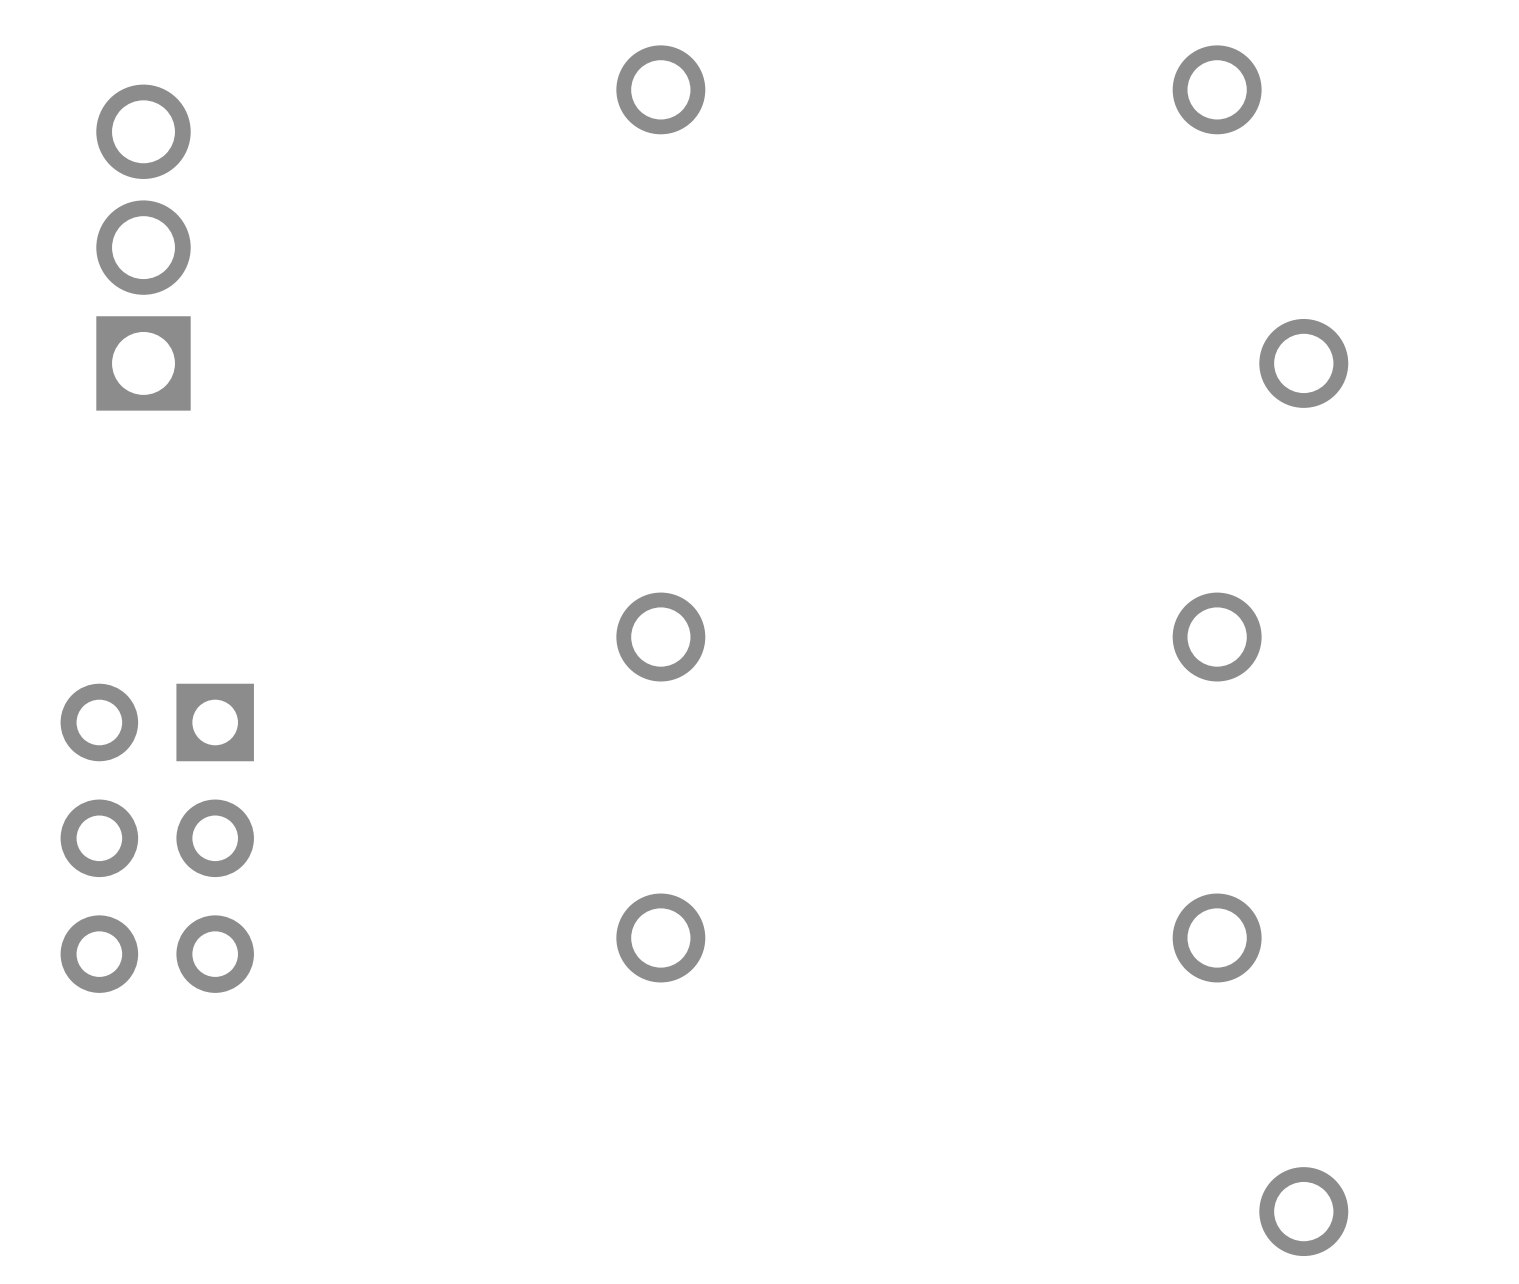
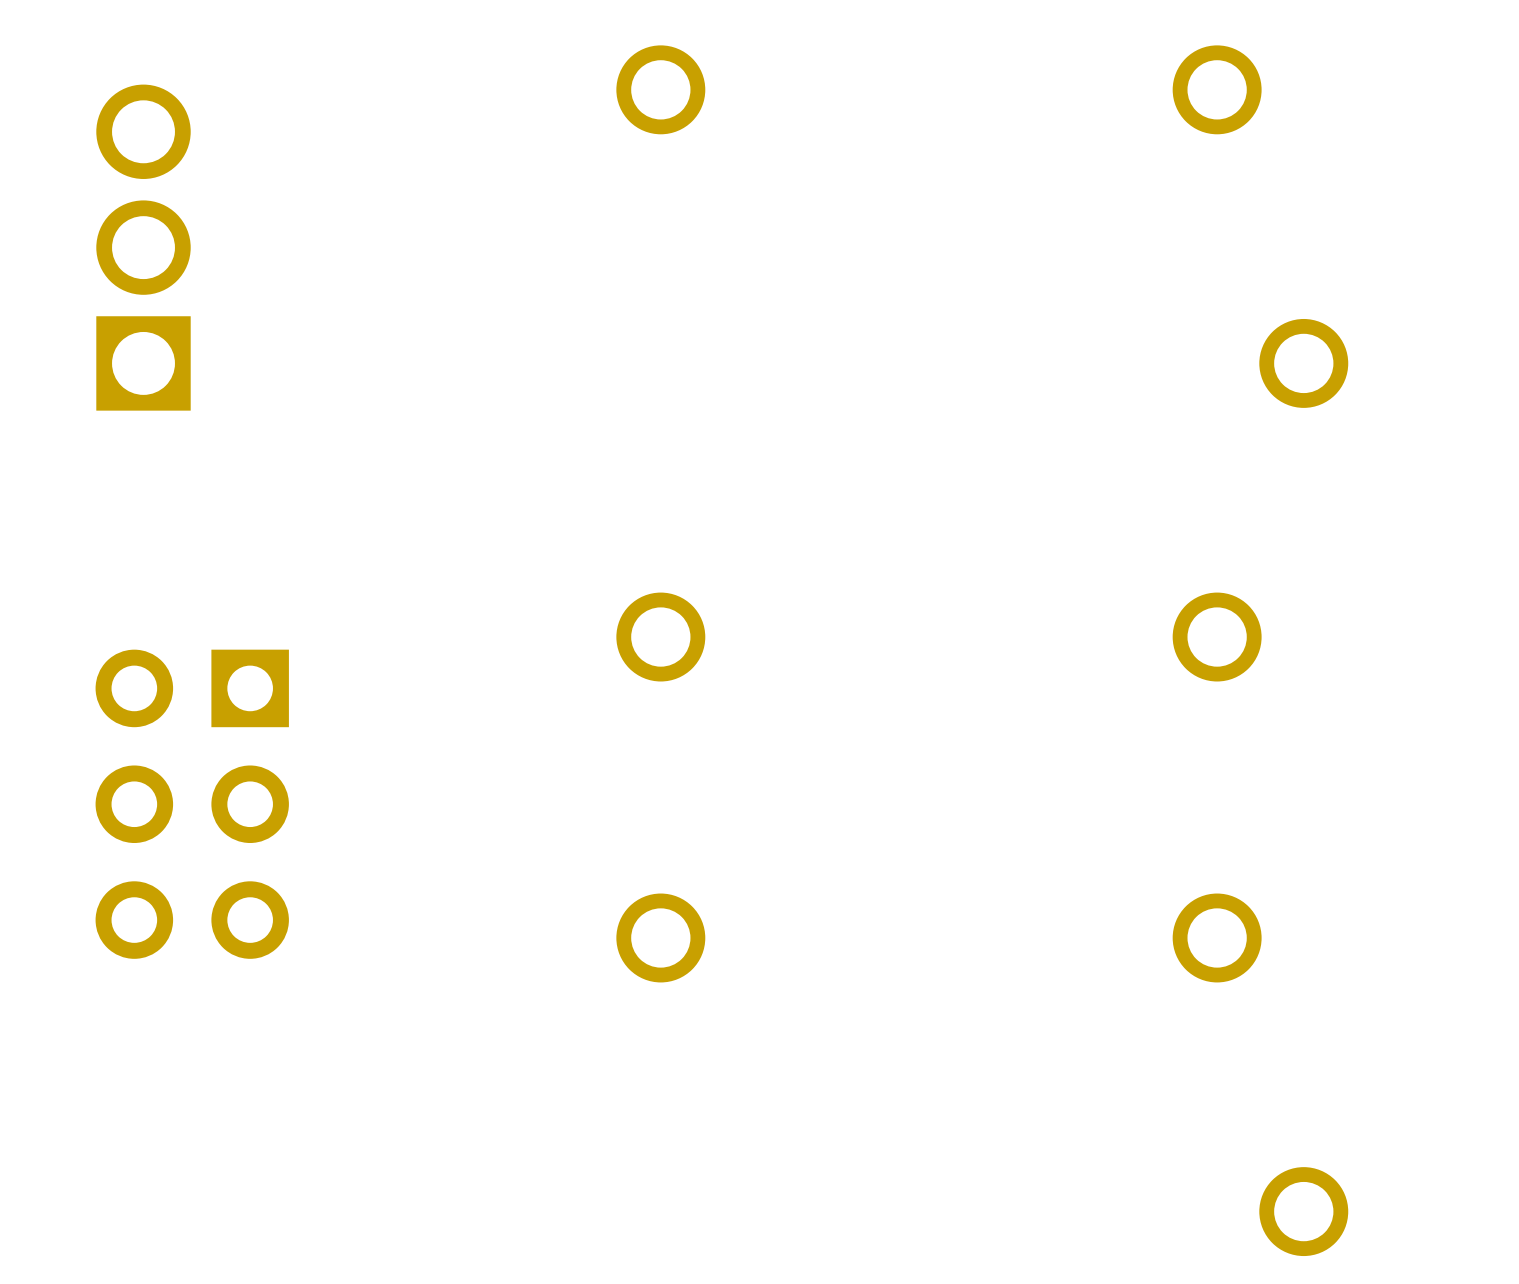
part position: (157, 838) -> (192, 804)

